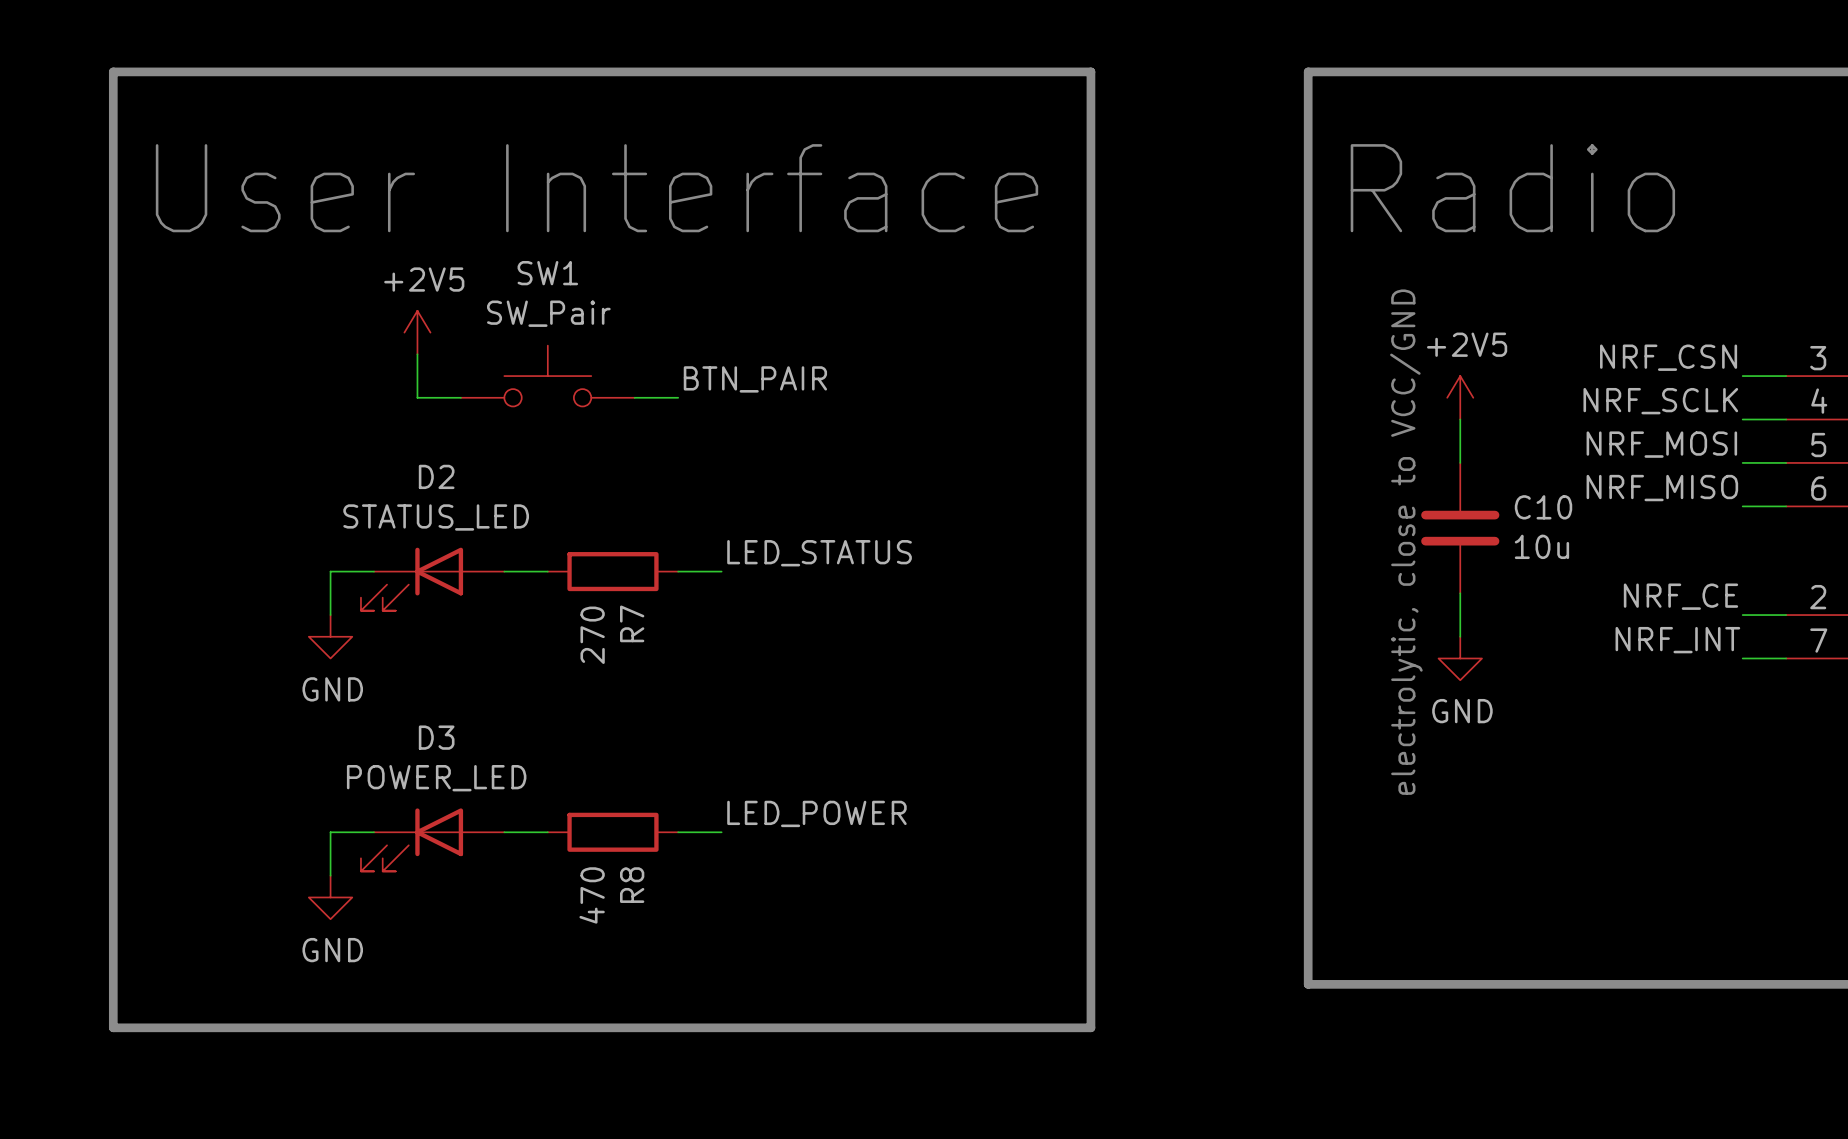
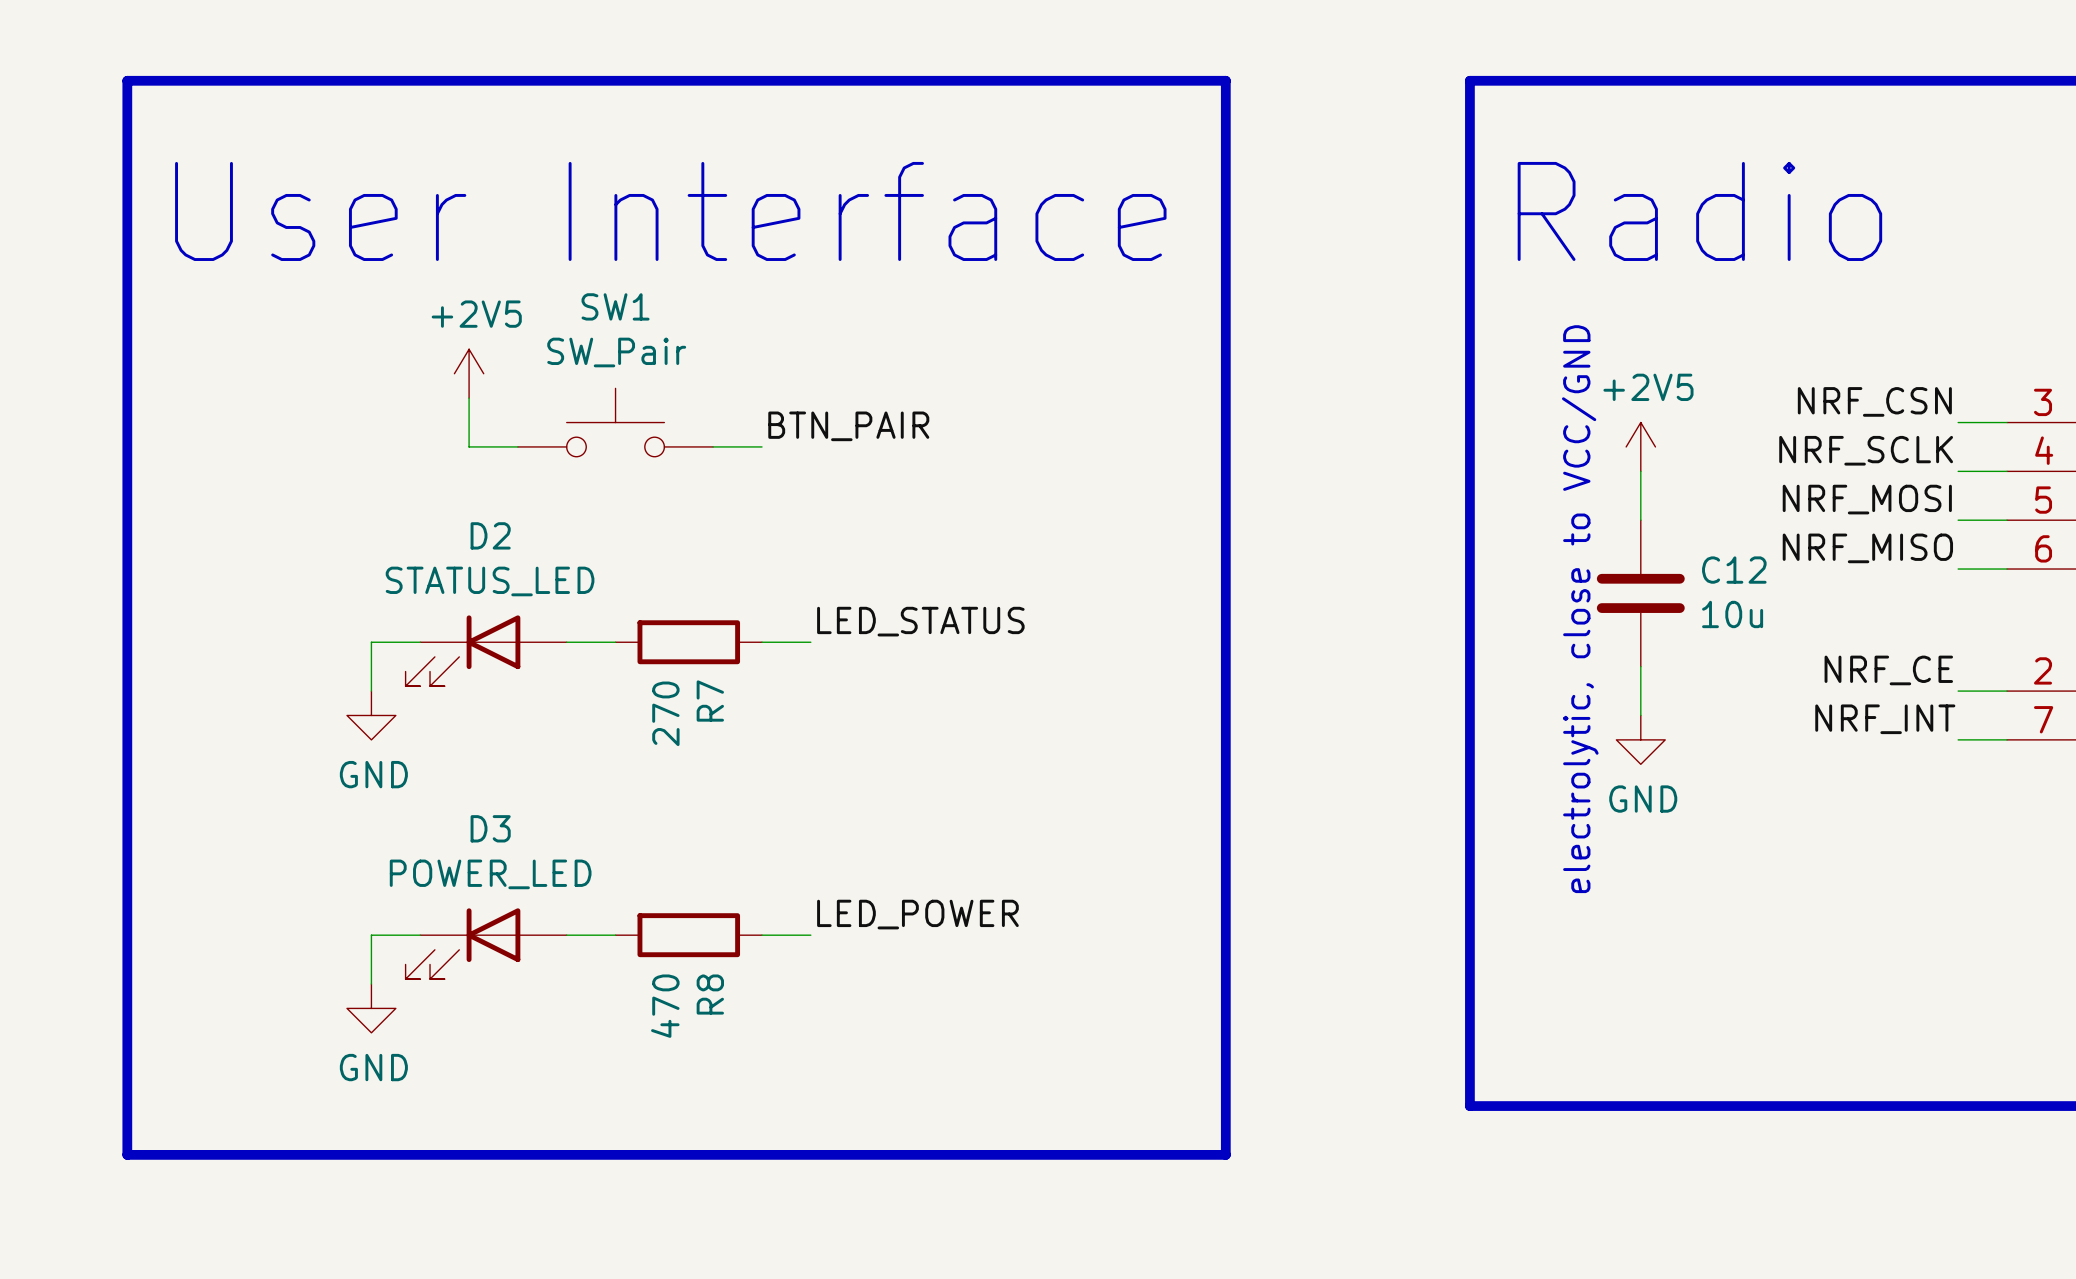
C10 name: C10 (1543, 507) -> C12 (1734, 570)

